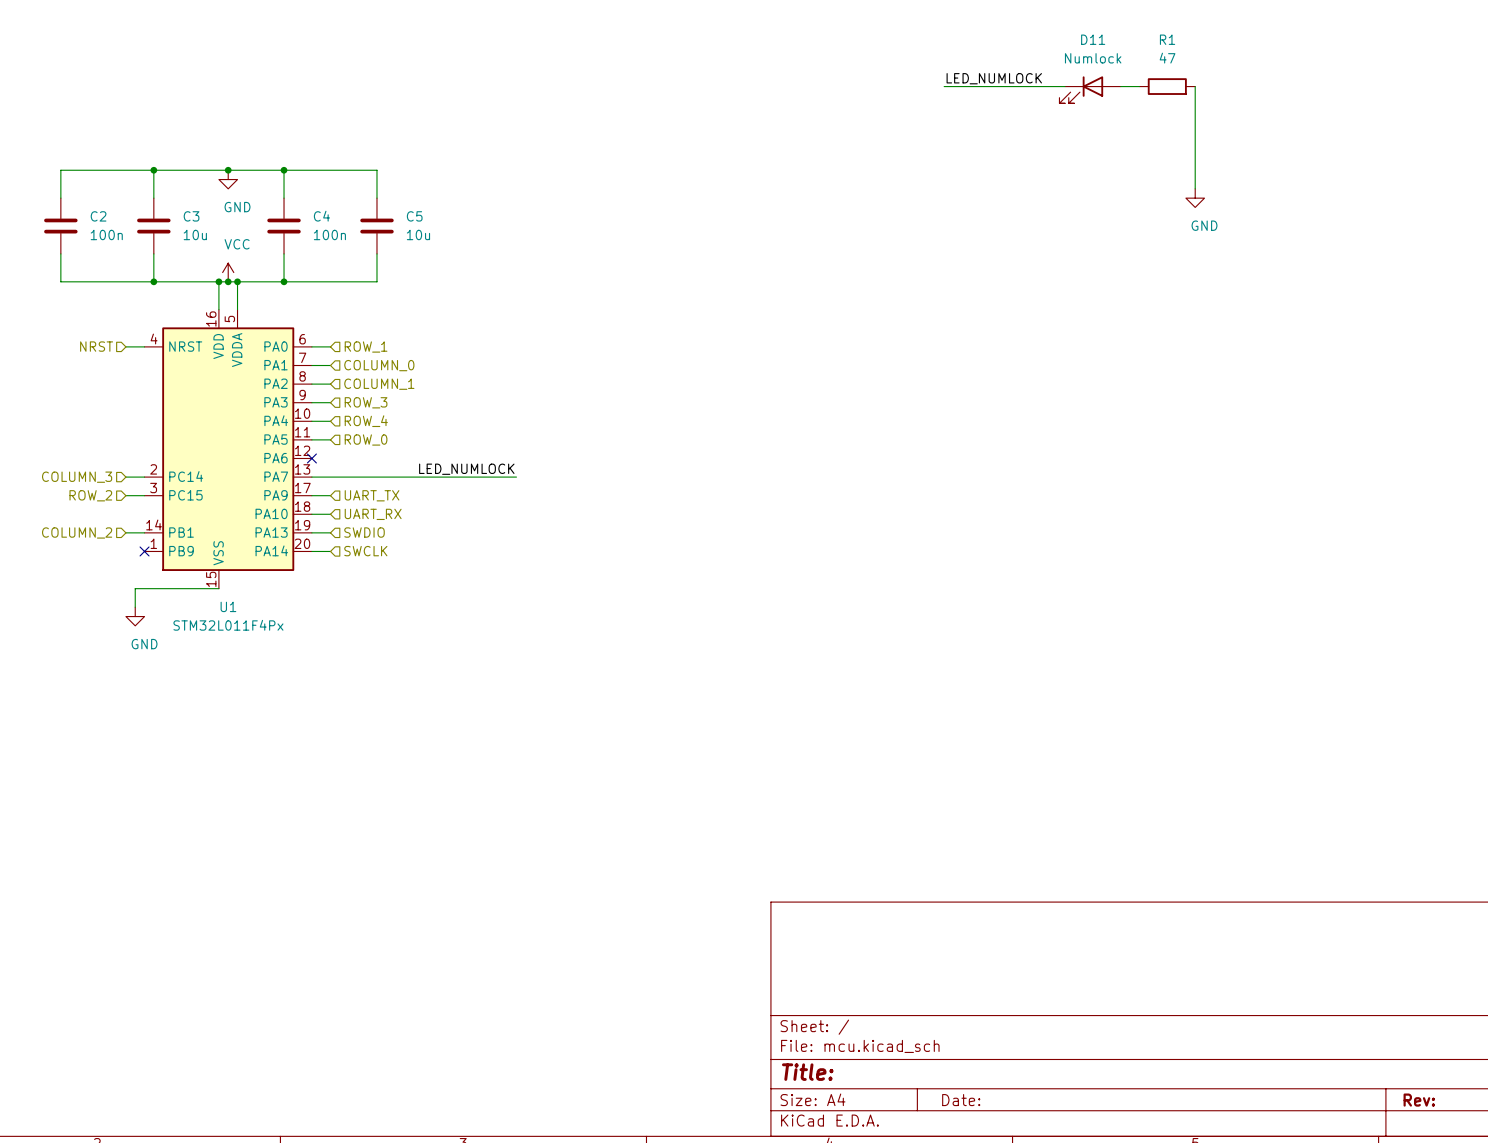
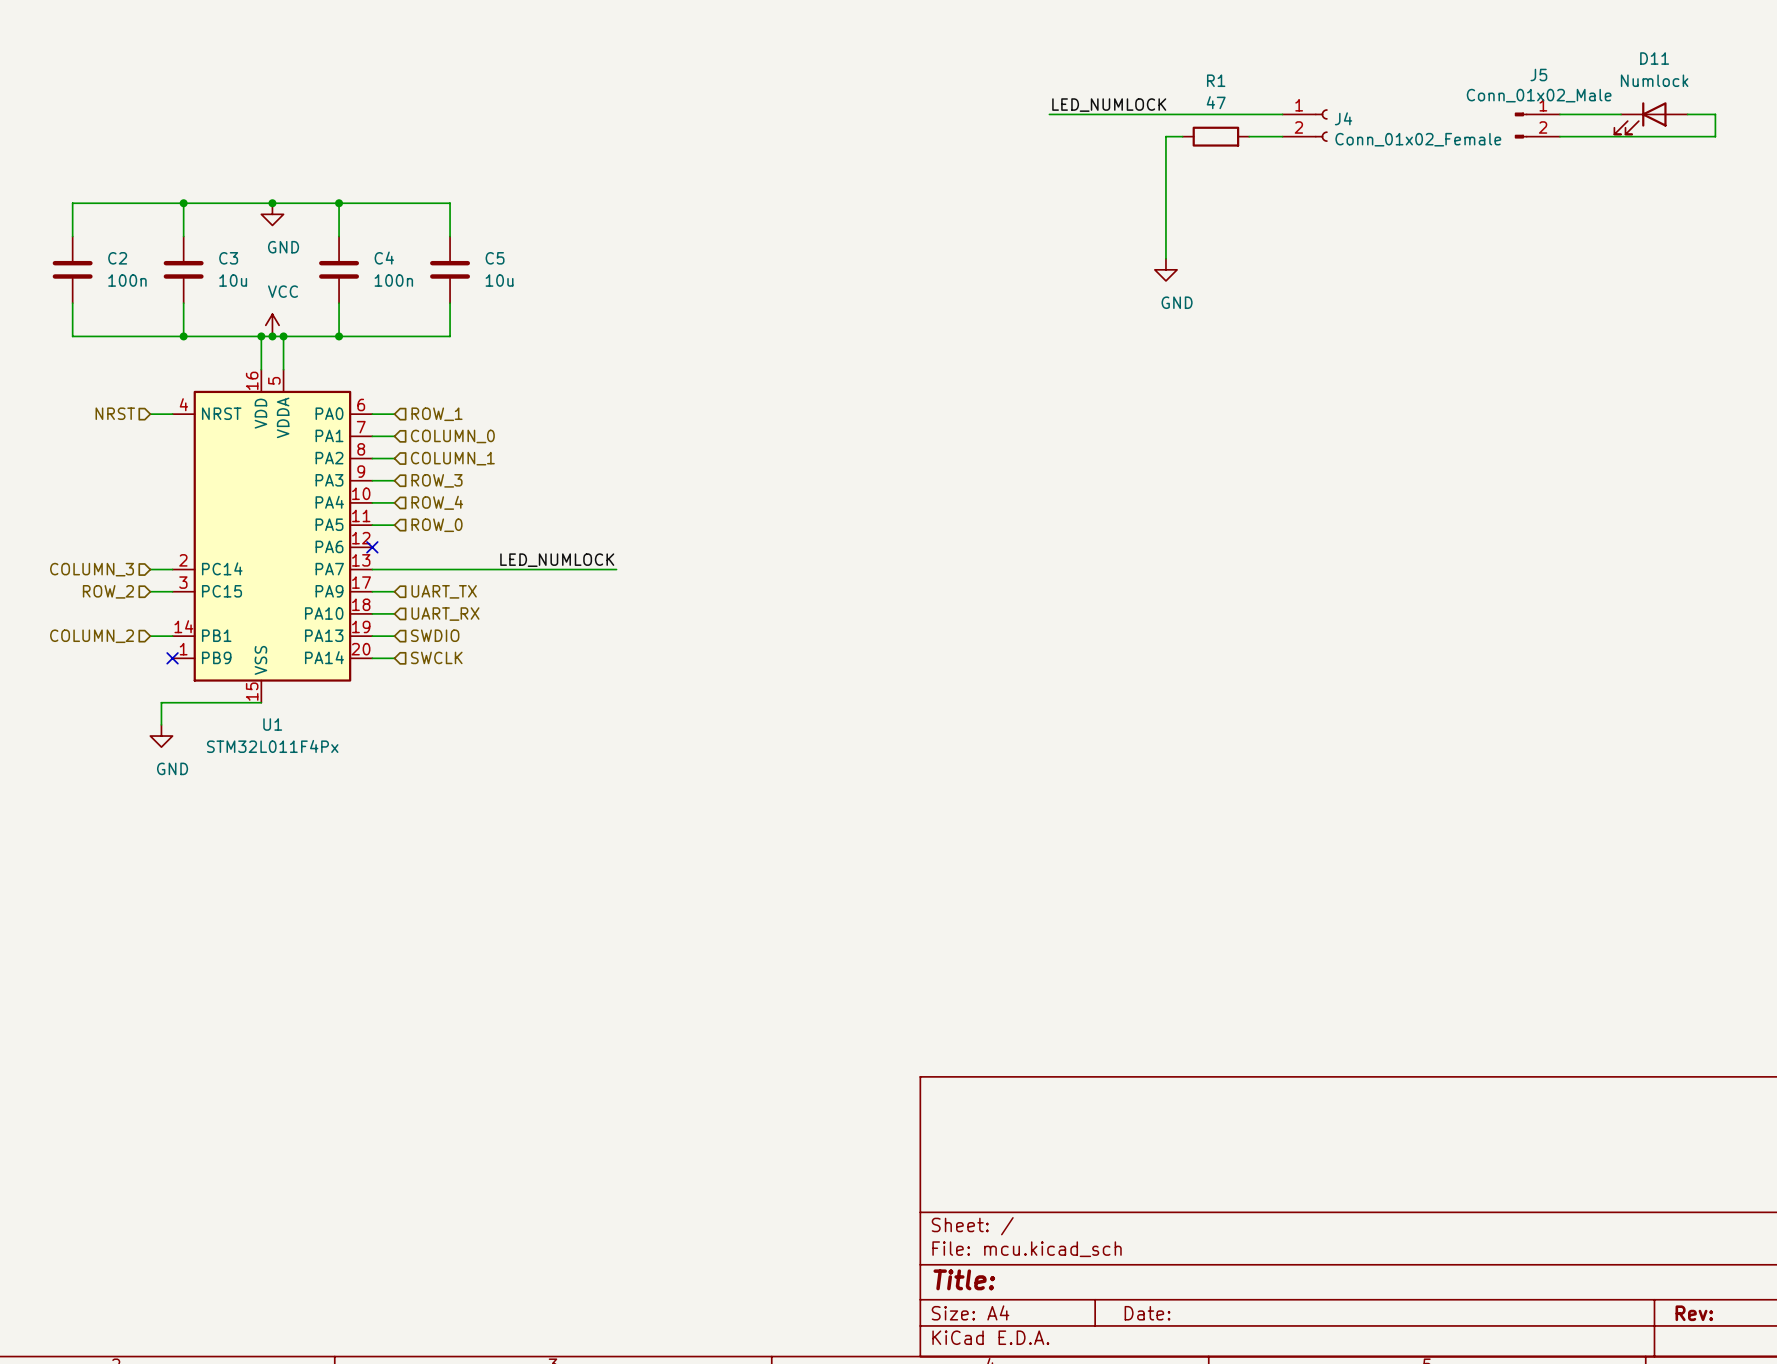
label position: LED_NUMLOCK (994, 78) -> LED_NUMLOCK (1109, 105)
wire: (944, 86) (1065, 86) -> none
wire: (1120, 86) (1139, 86) -> none
R1 position: (1167, 86) -> (1215, 136)
wire: (1195, 86) (1195, 188) -> none
D11 position: (1090, 89) -> (1651, 118)
wire: none -> (1049, 114) (1282, 114)
wire: none -> (1560, 114) (1621, 114)
wire: none -> (1687, 114) (1715, 114) (1715, 136) (1560, 136)
J4: none -> Conn_01x02_Female (1305, 125)
J5: none -> Conn_01x02_Male (1537, 125)
wire: none -> (1182, 136) (1165, 136) (1165, 258)
wire: none -> (1249, 136) (1282, 136)
power symbol: GND (1195, 198) -> none
power symbol: none -> GND (1165, 269)

